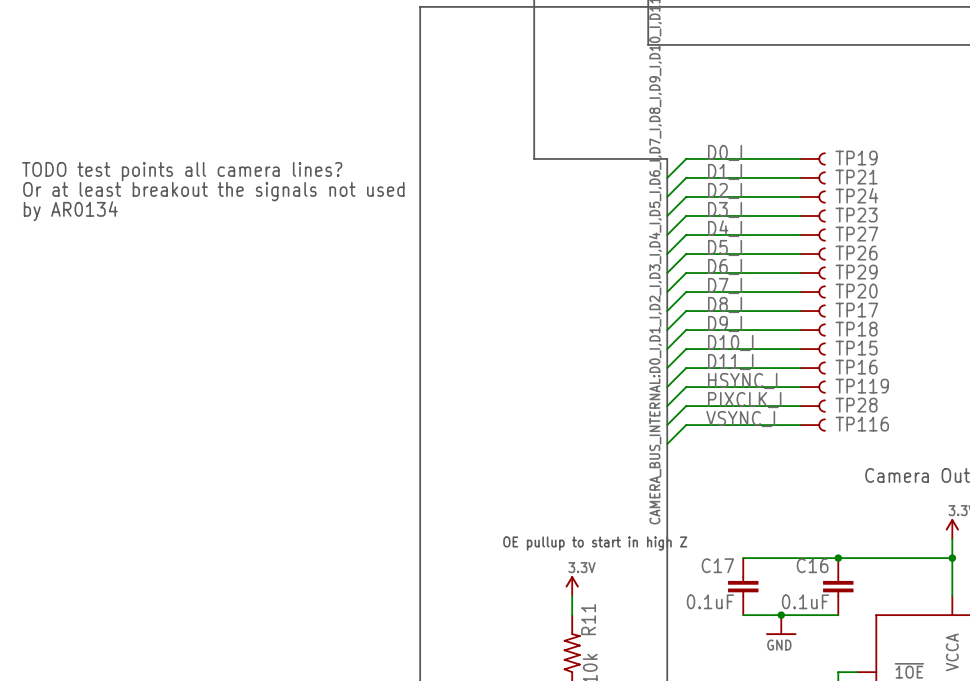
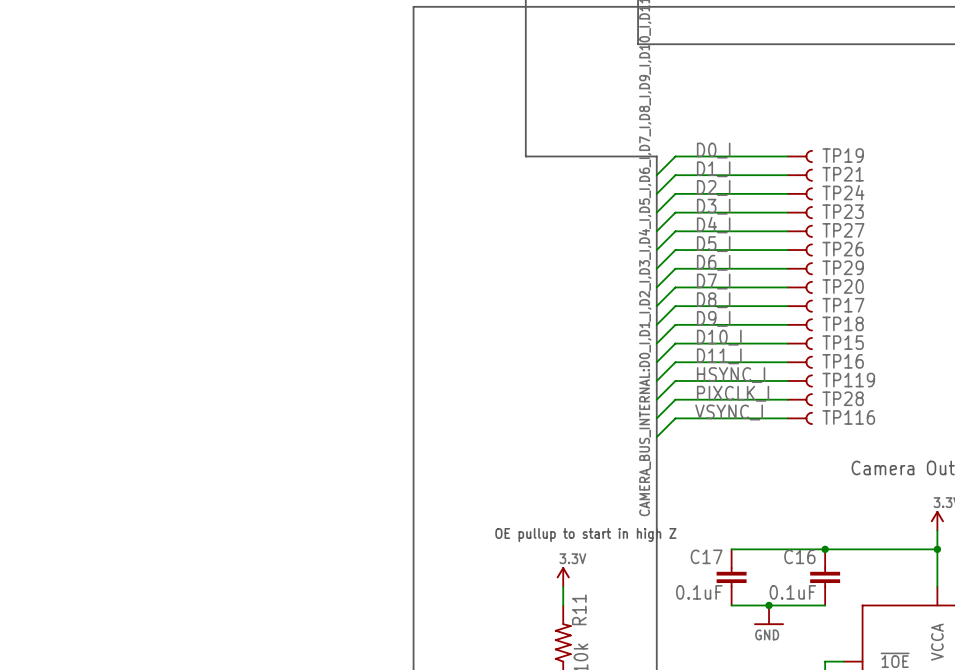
text: TODO test points all camera lines? (182, 171) -> none
text: Or at least breakout the signals not used (213, 191) -> none
text: by AR0134 (70, 211) -> none

